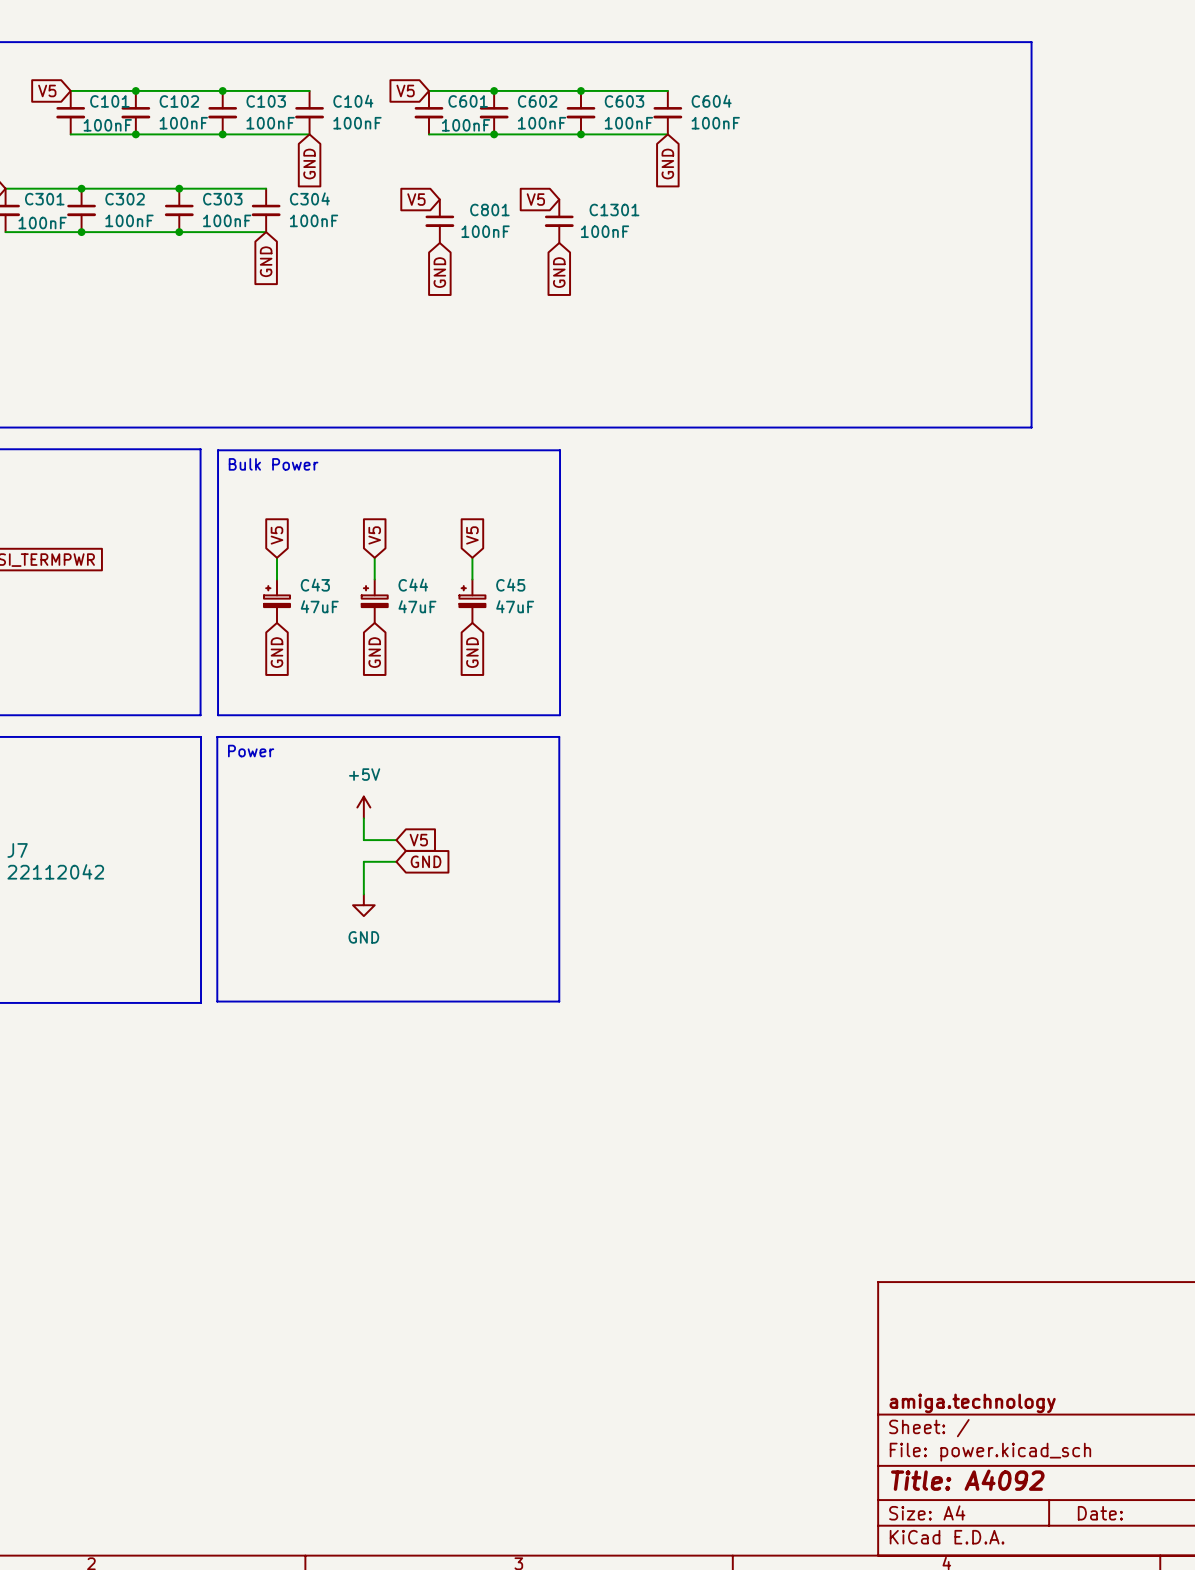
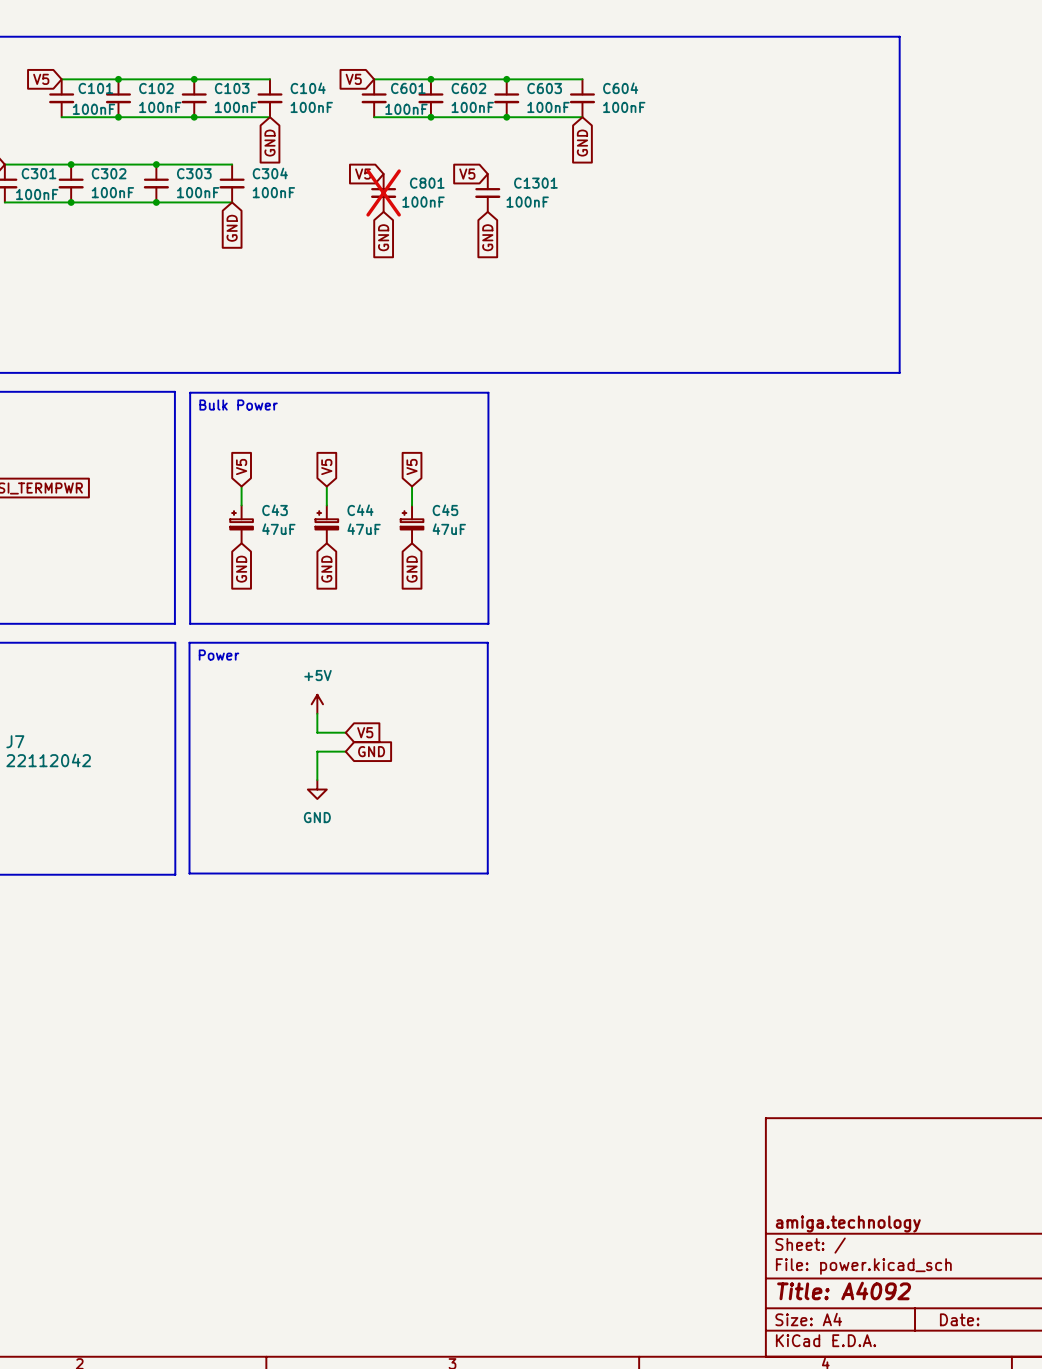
C801 do-not-place cross: none -> (383, 192)

